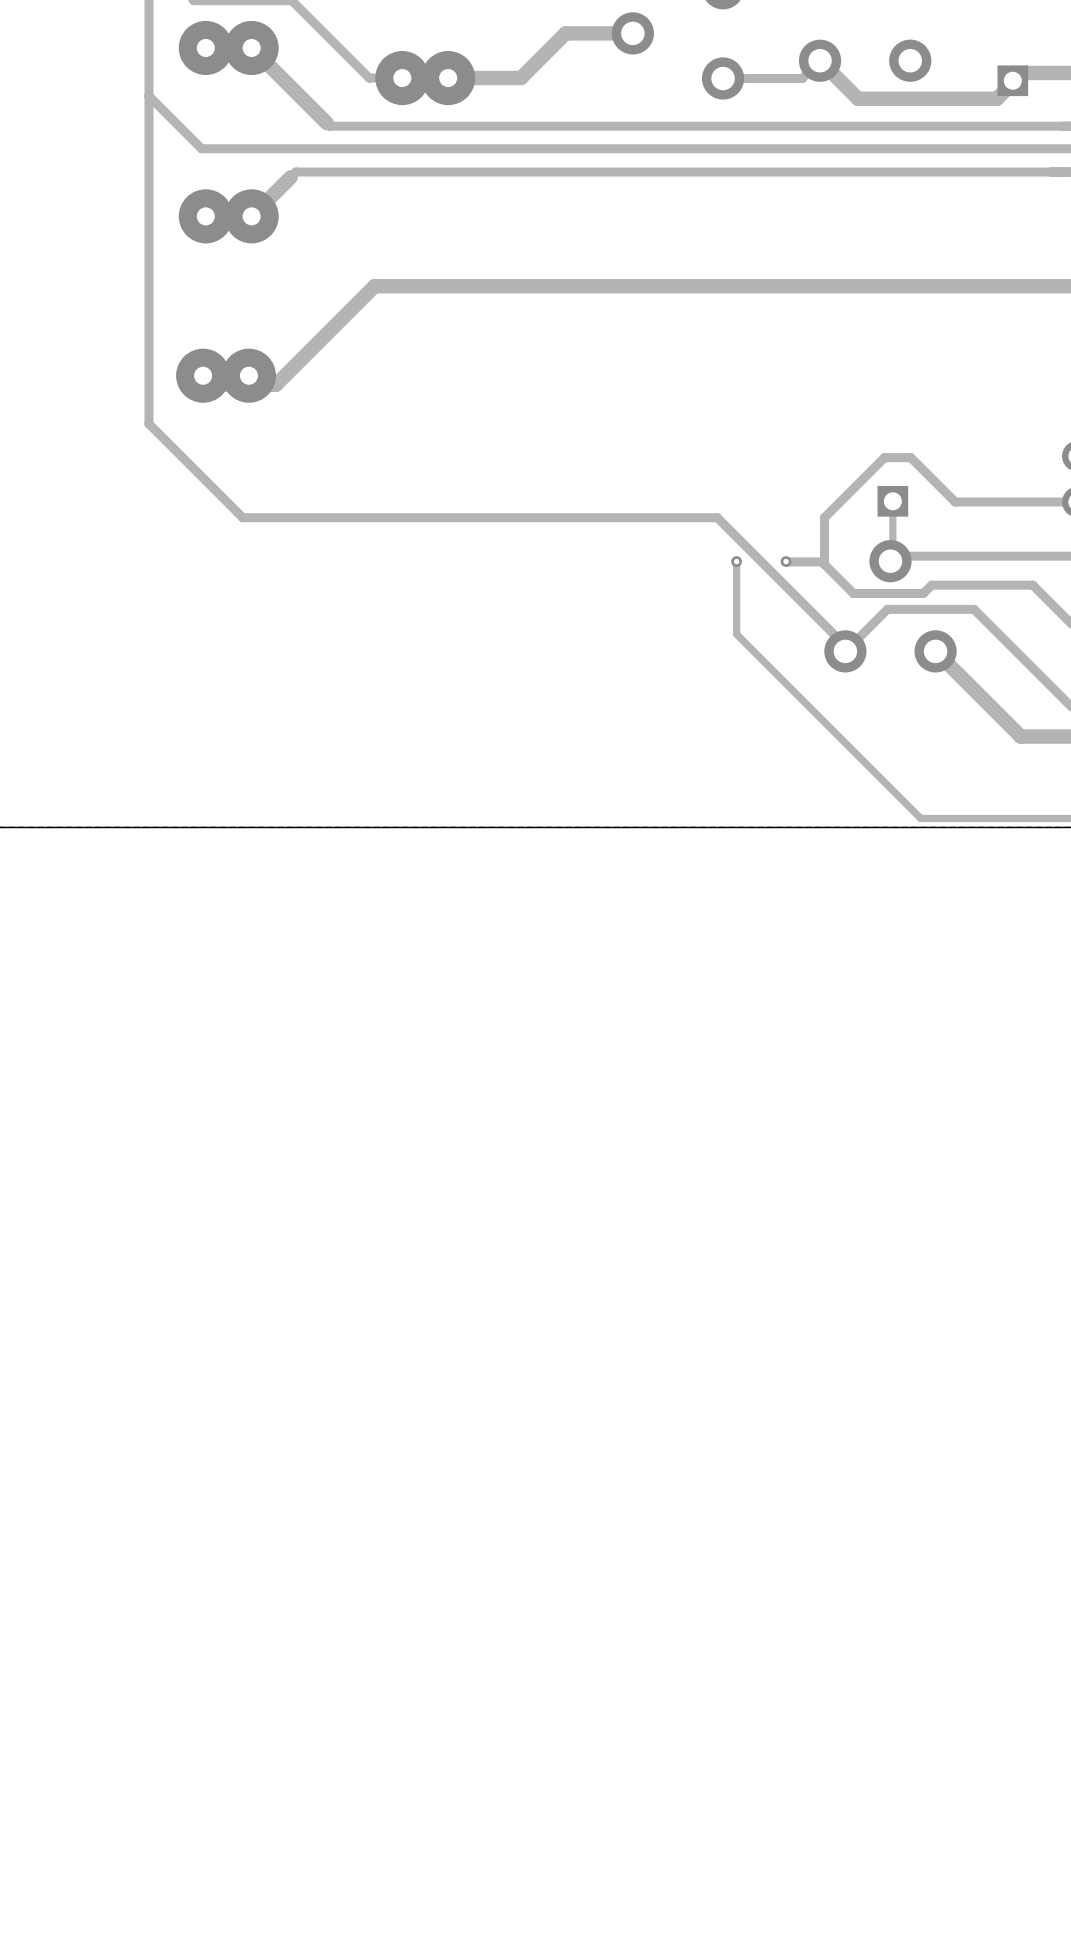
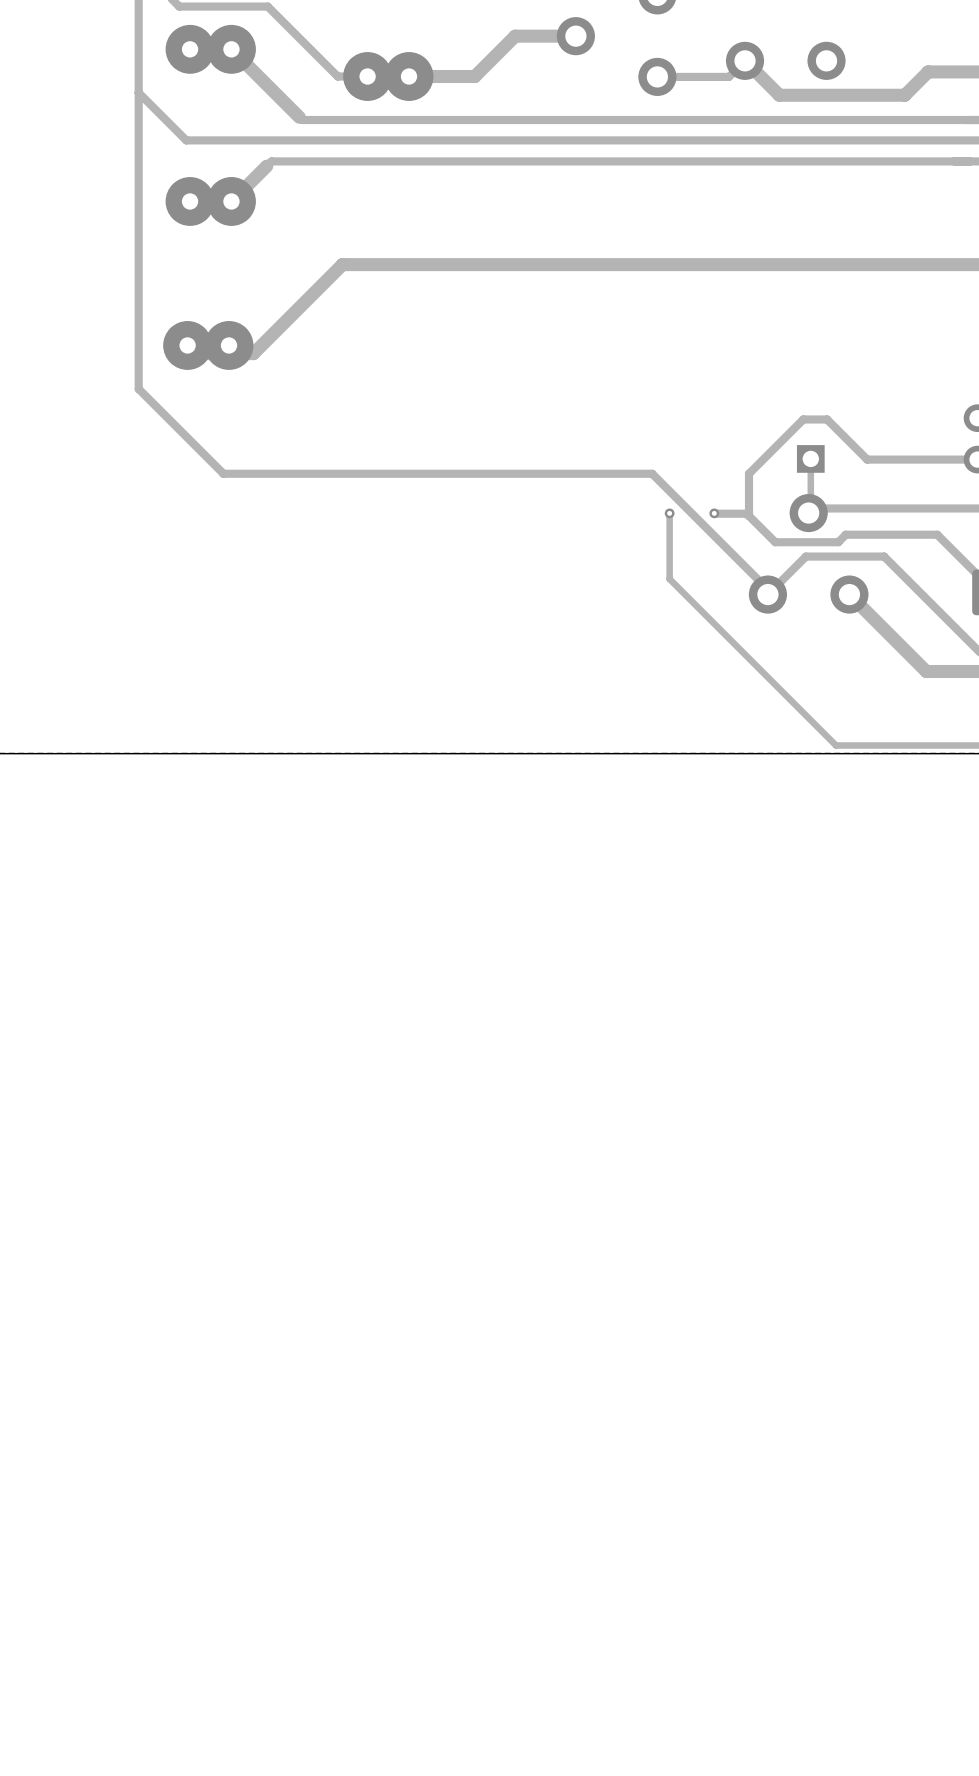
part: (1012, 80) -> none

